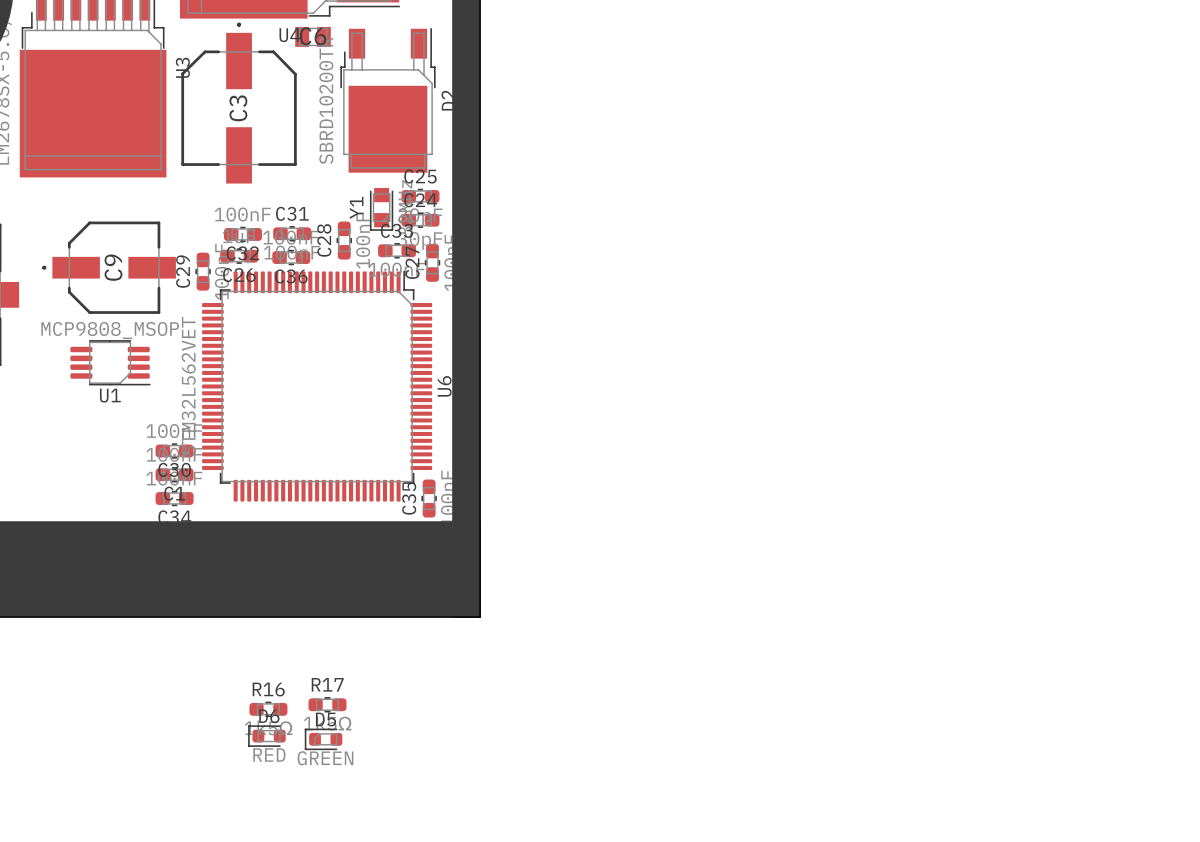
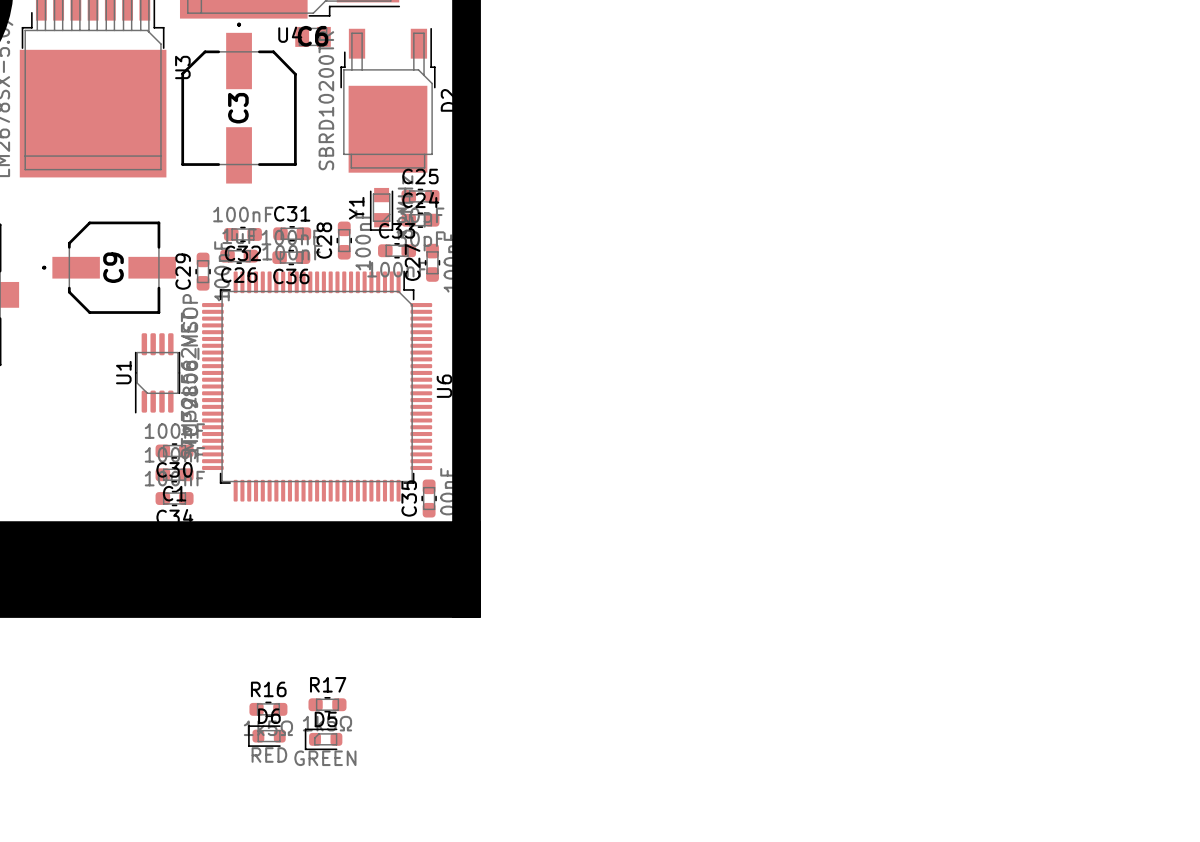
U1 rotation: 0° (110, 362) -> 90° clockwise (157, 373)
U1 position: (110, 362) -> (157, 373)

